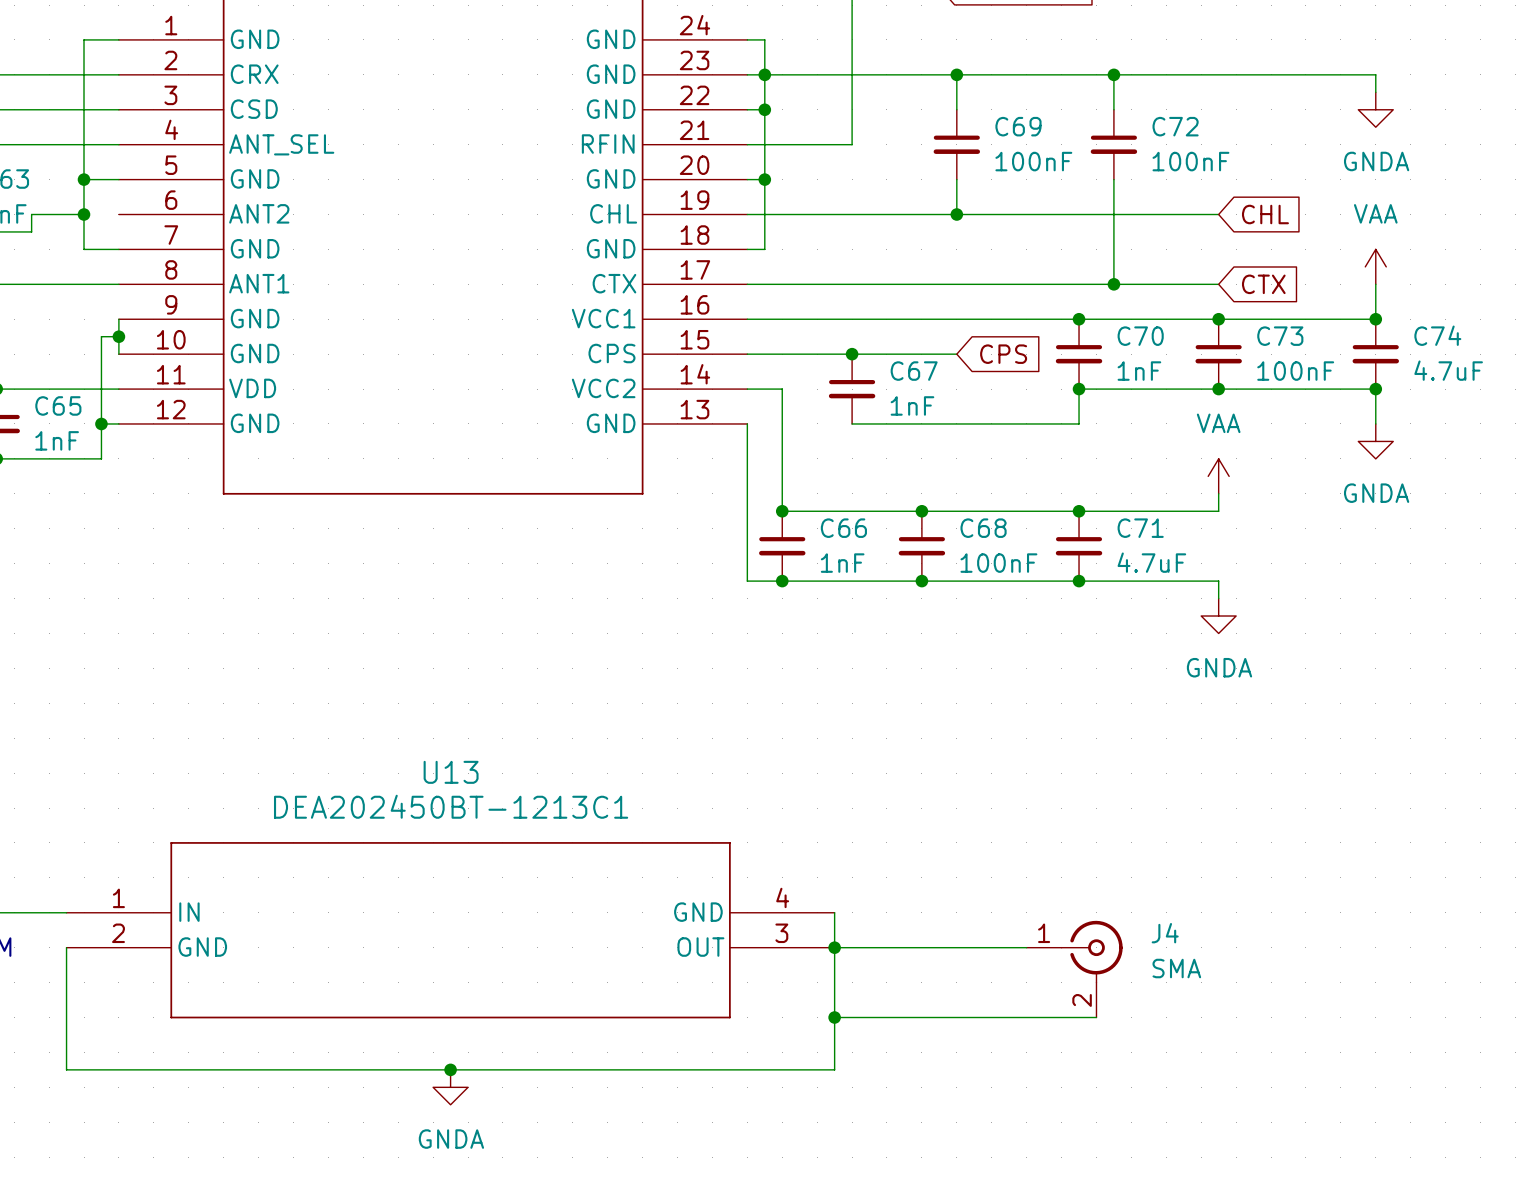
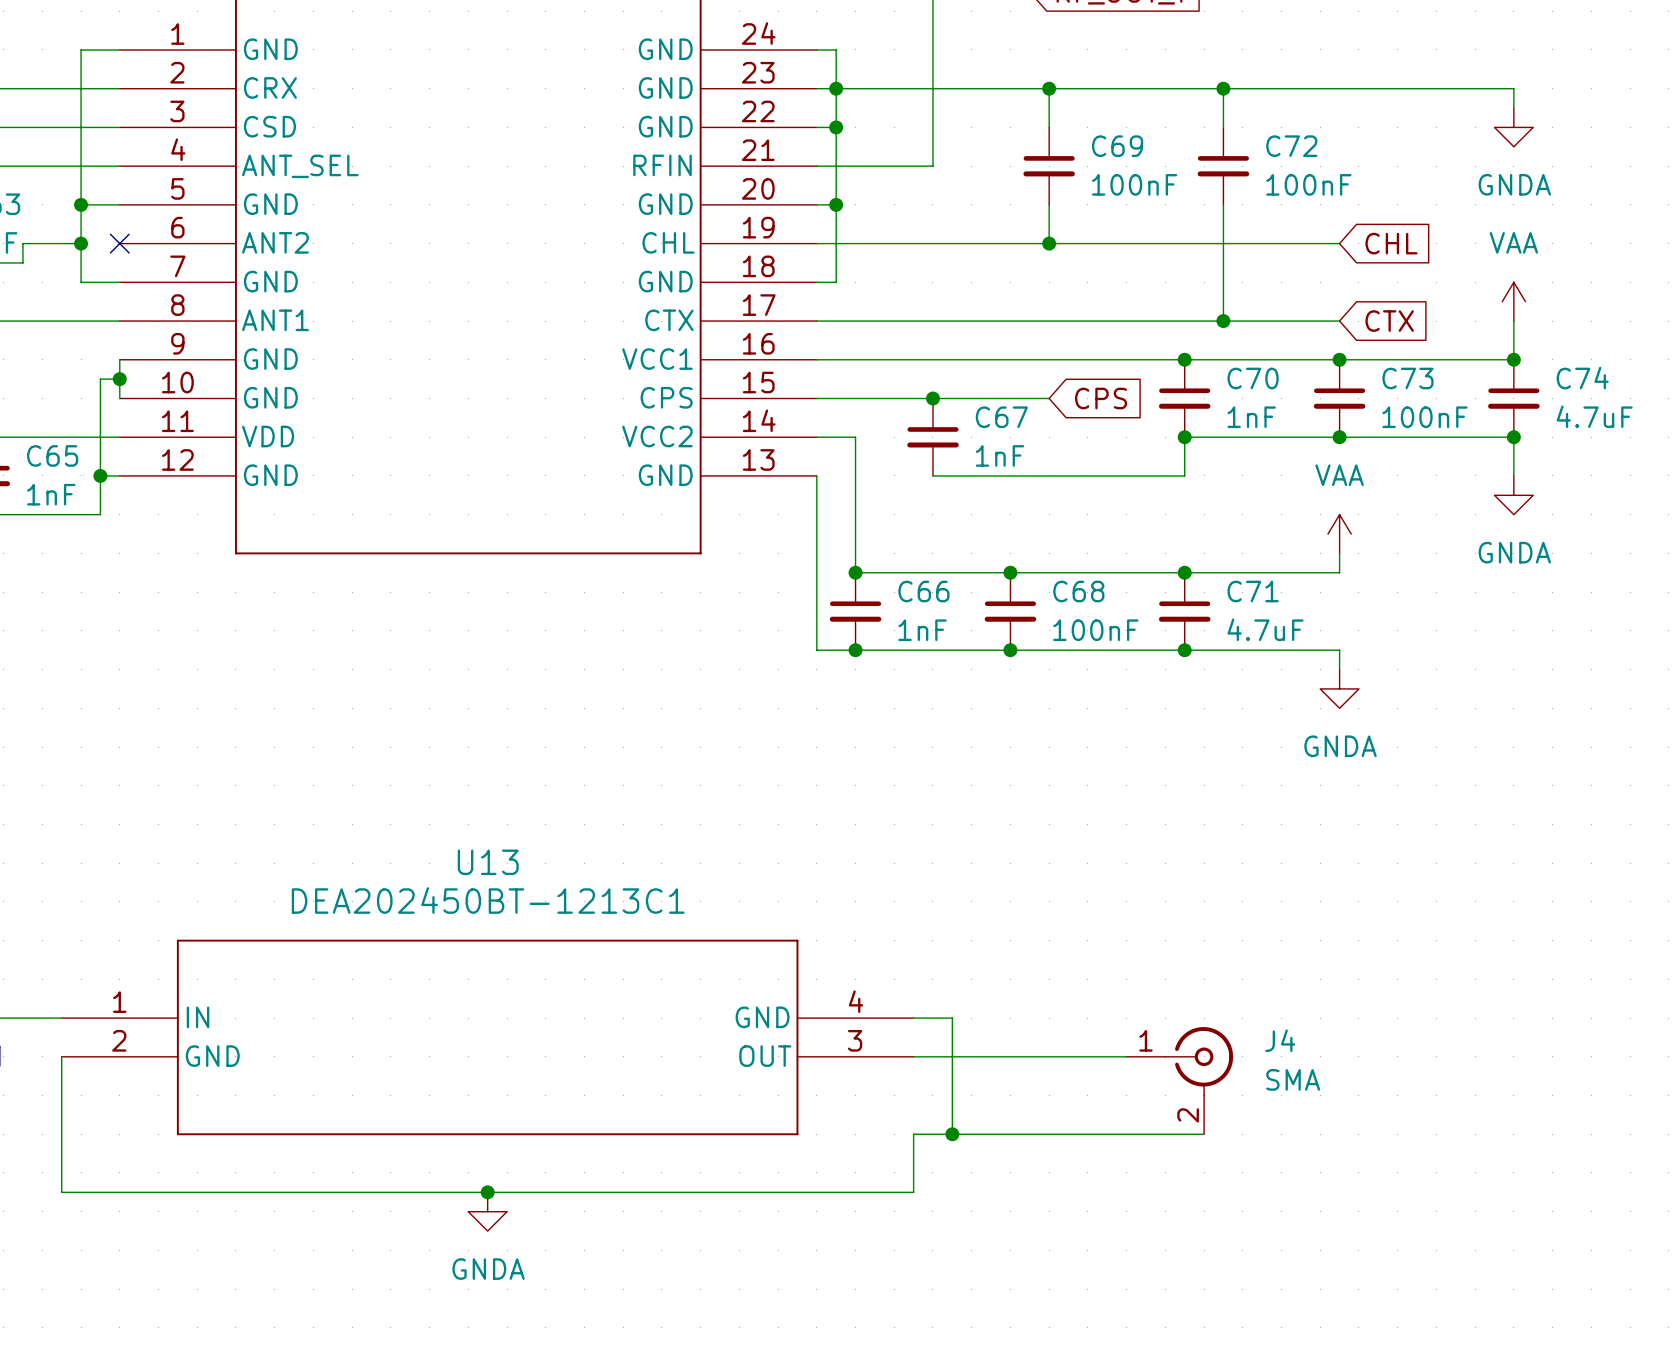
no-connect mark: none -> (119, 243)
wire: (834, 912) (834, 1017) -> (913, 1018) (952, 1018) (952, 1134)
junction: (834, 947) -> none
junction position: (834, 1017) -> (952, 1134)

